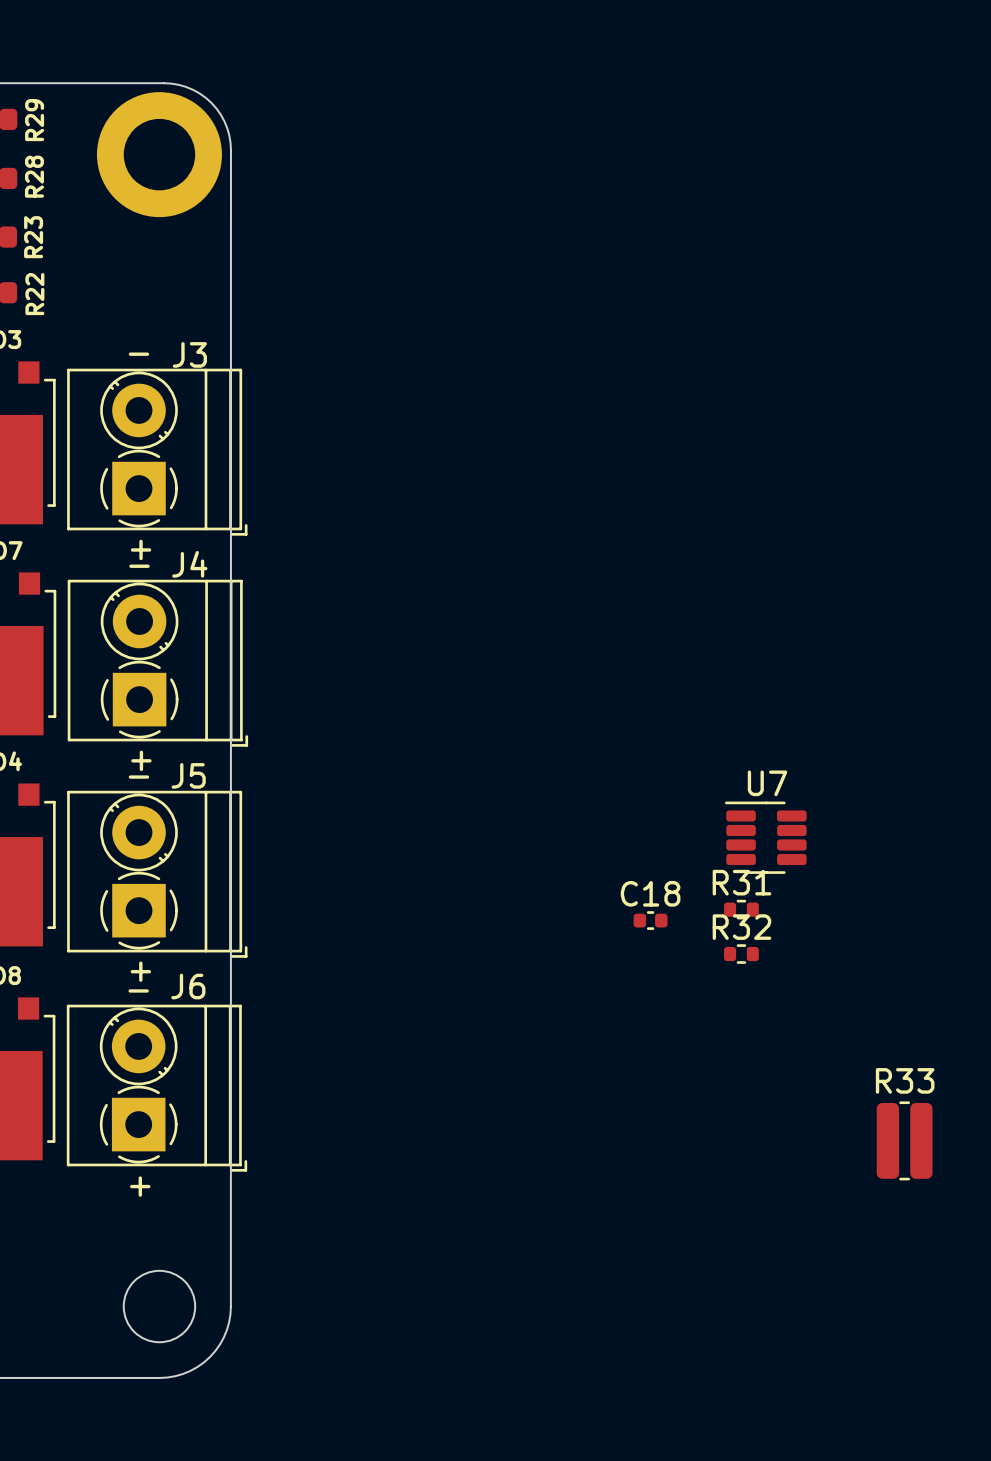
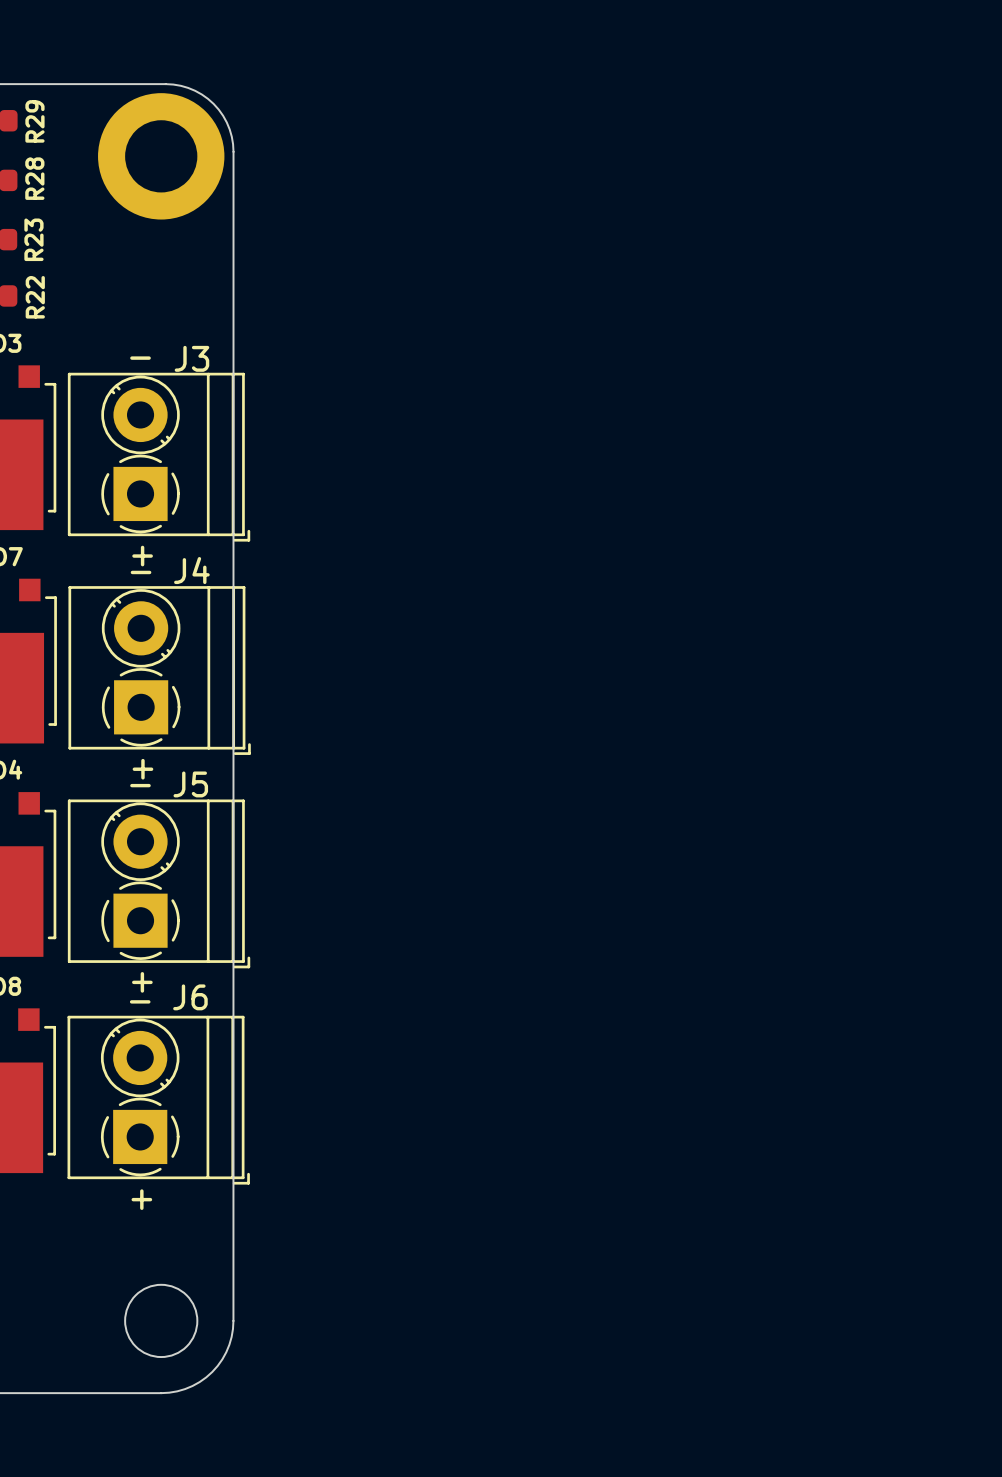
U7: (765, 837) -> none
R31: (741, 909) -> none
C18: (650, 920) -> none
R32: (741, 954) -> none
R33: (904, 1140) -> none

